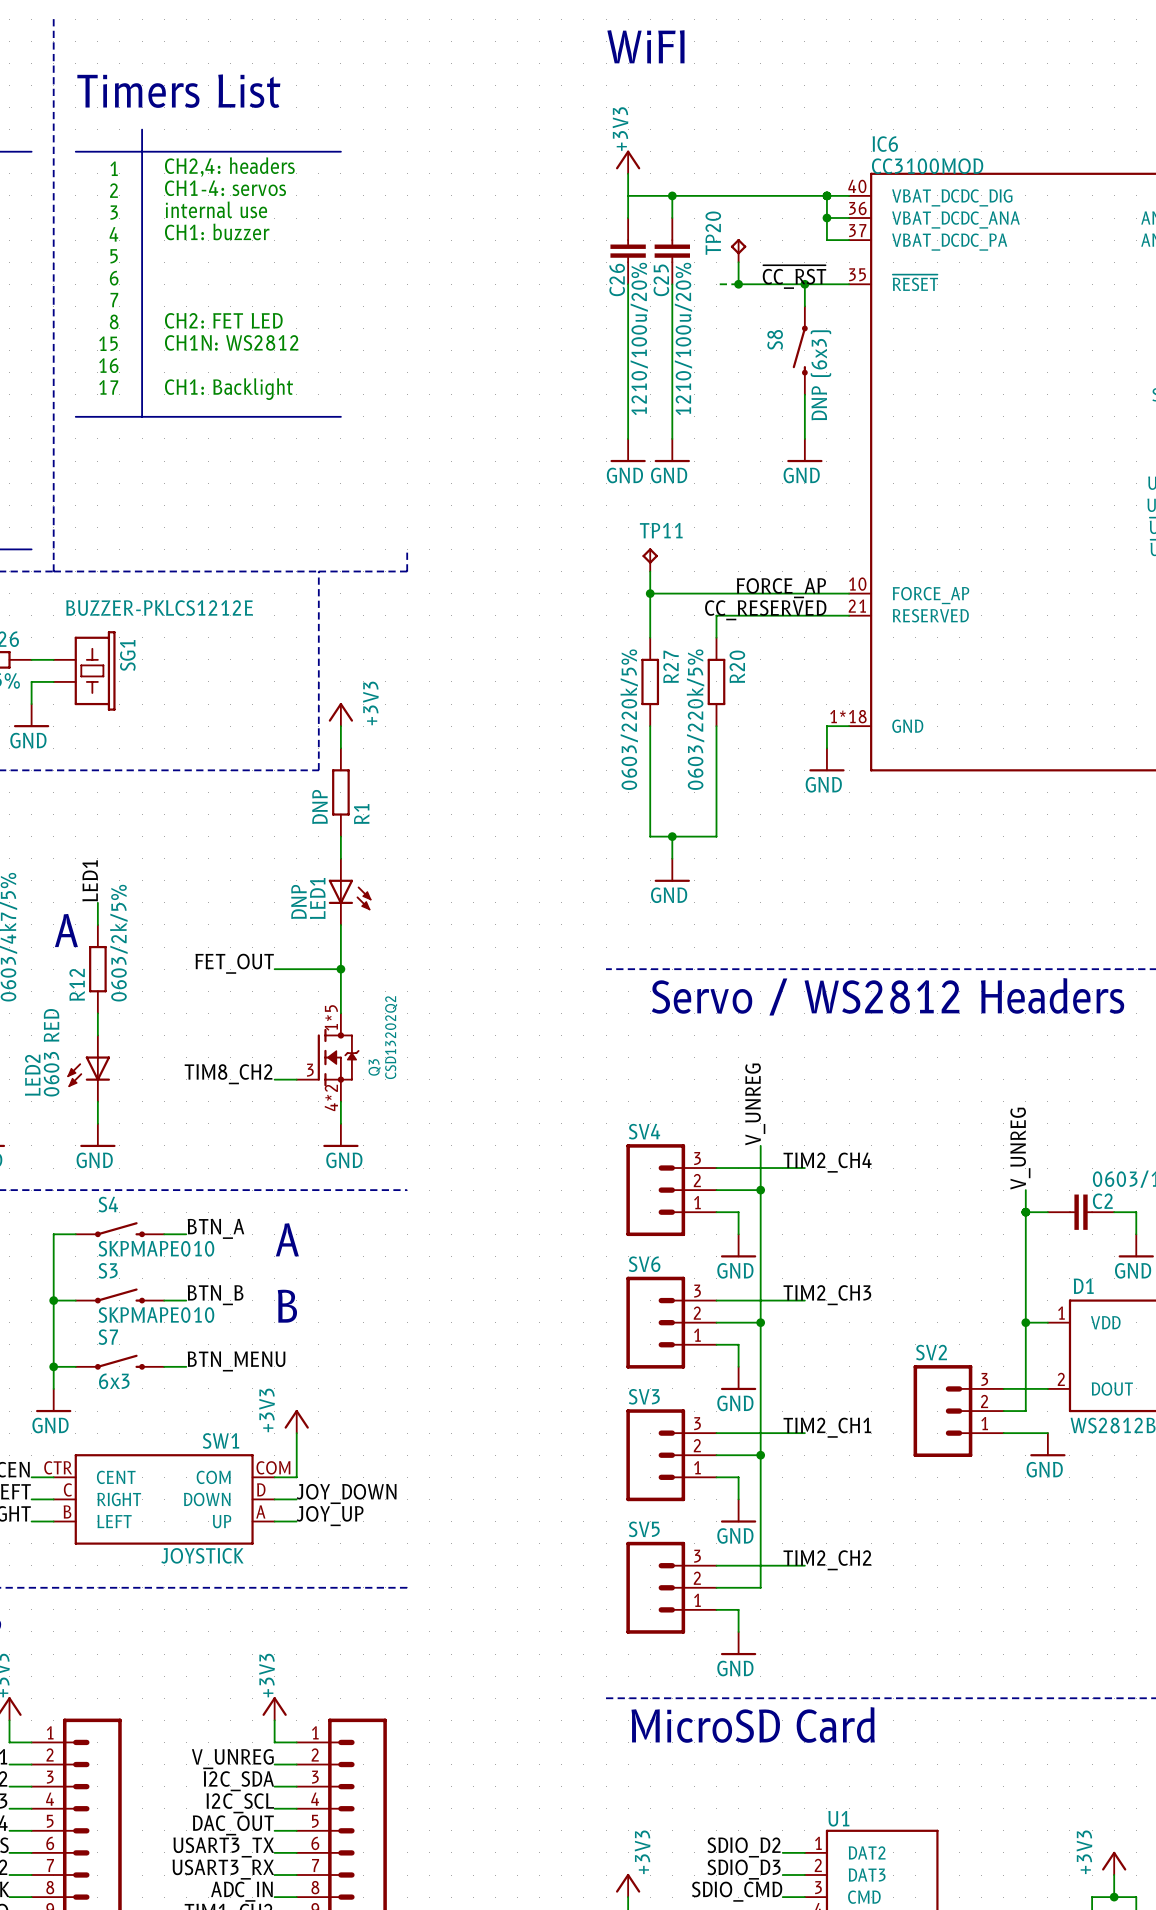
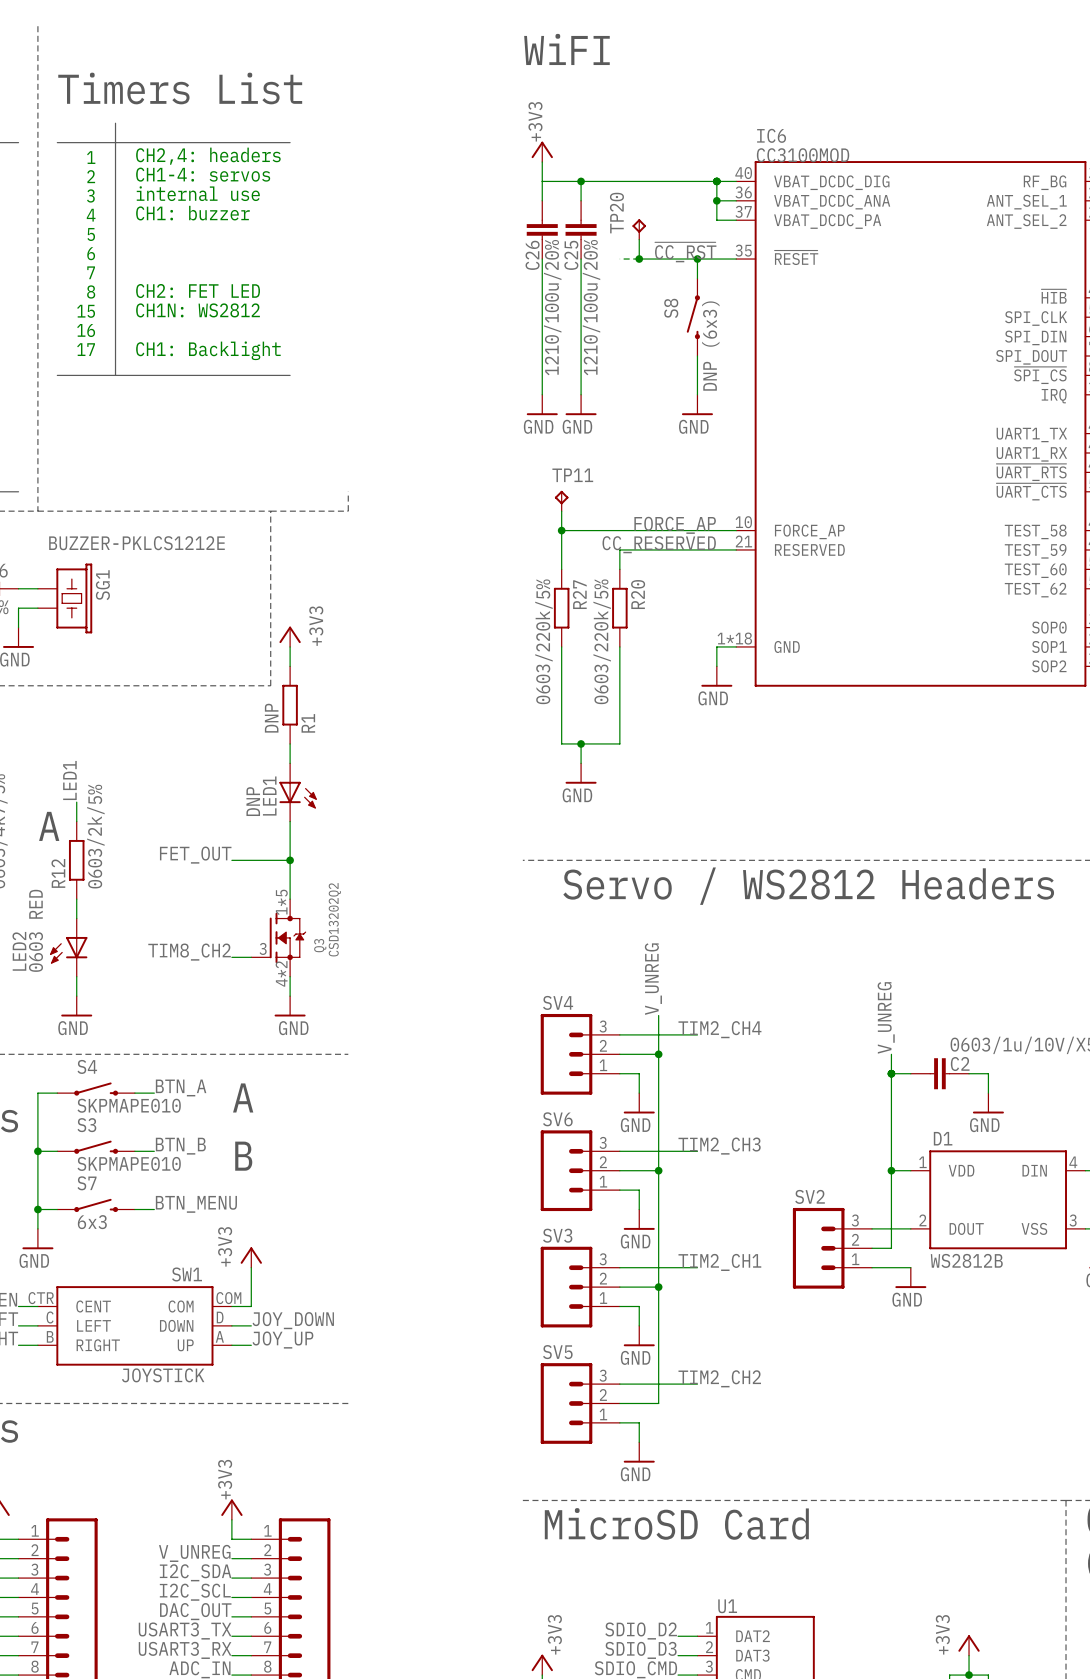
SW1 pin name: RIGHT (119, 1499) -> LEFT (93, 1325)
SW1 pin name: LEFT (114, 1521) -> RIGHT (98, 1345)

